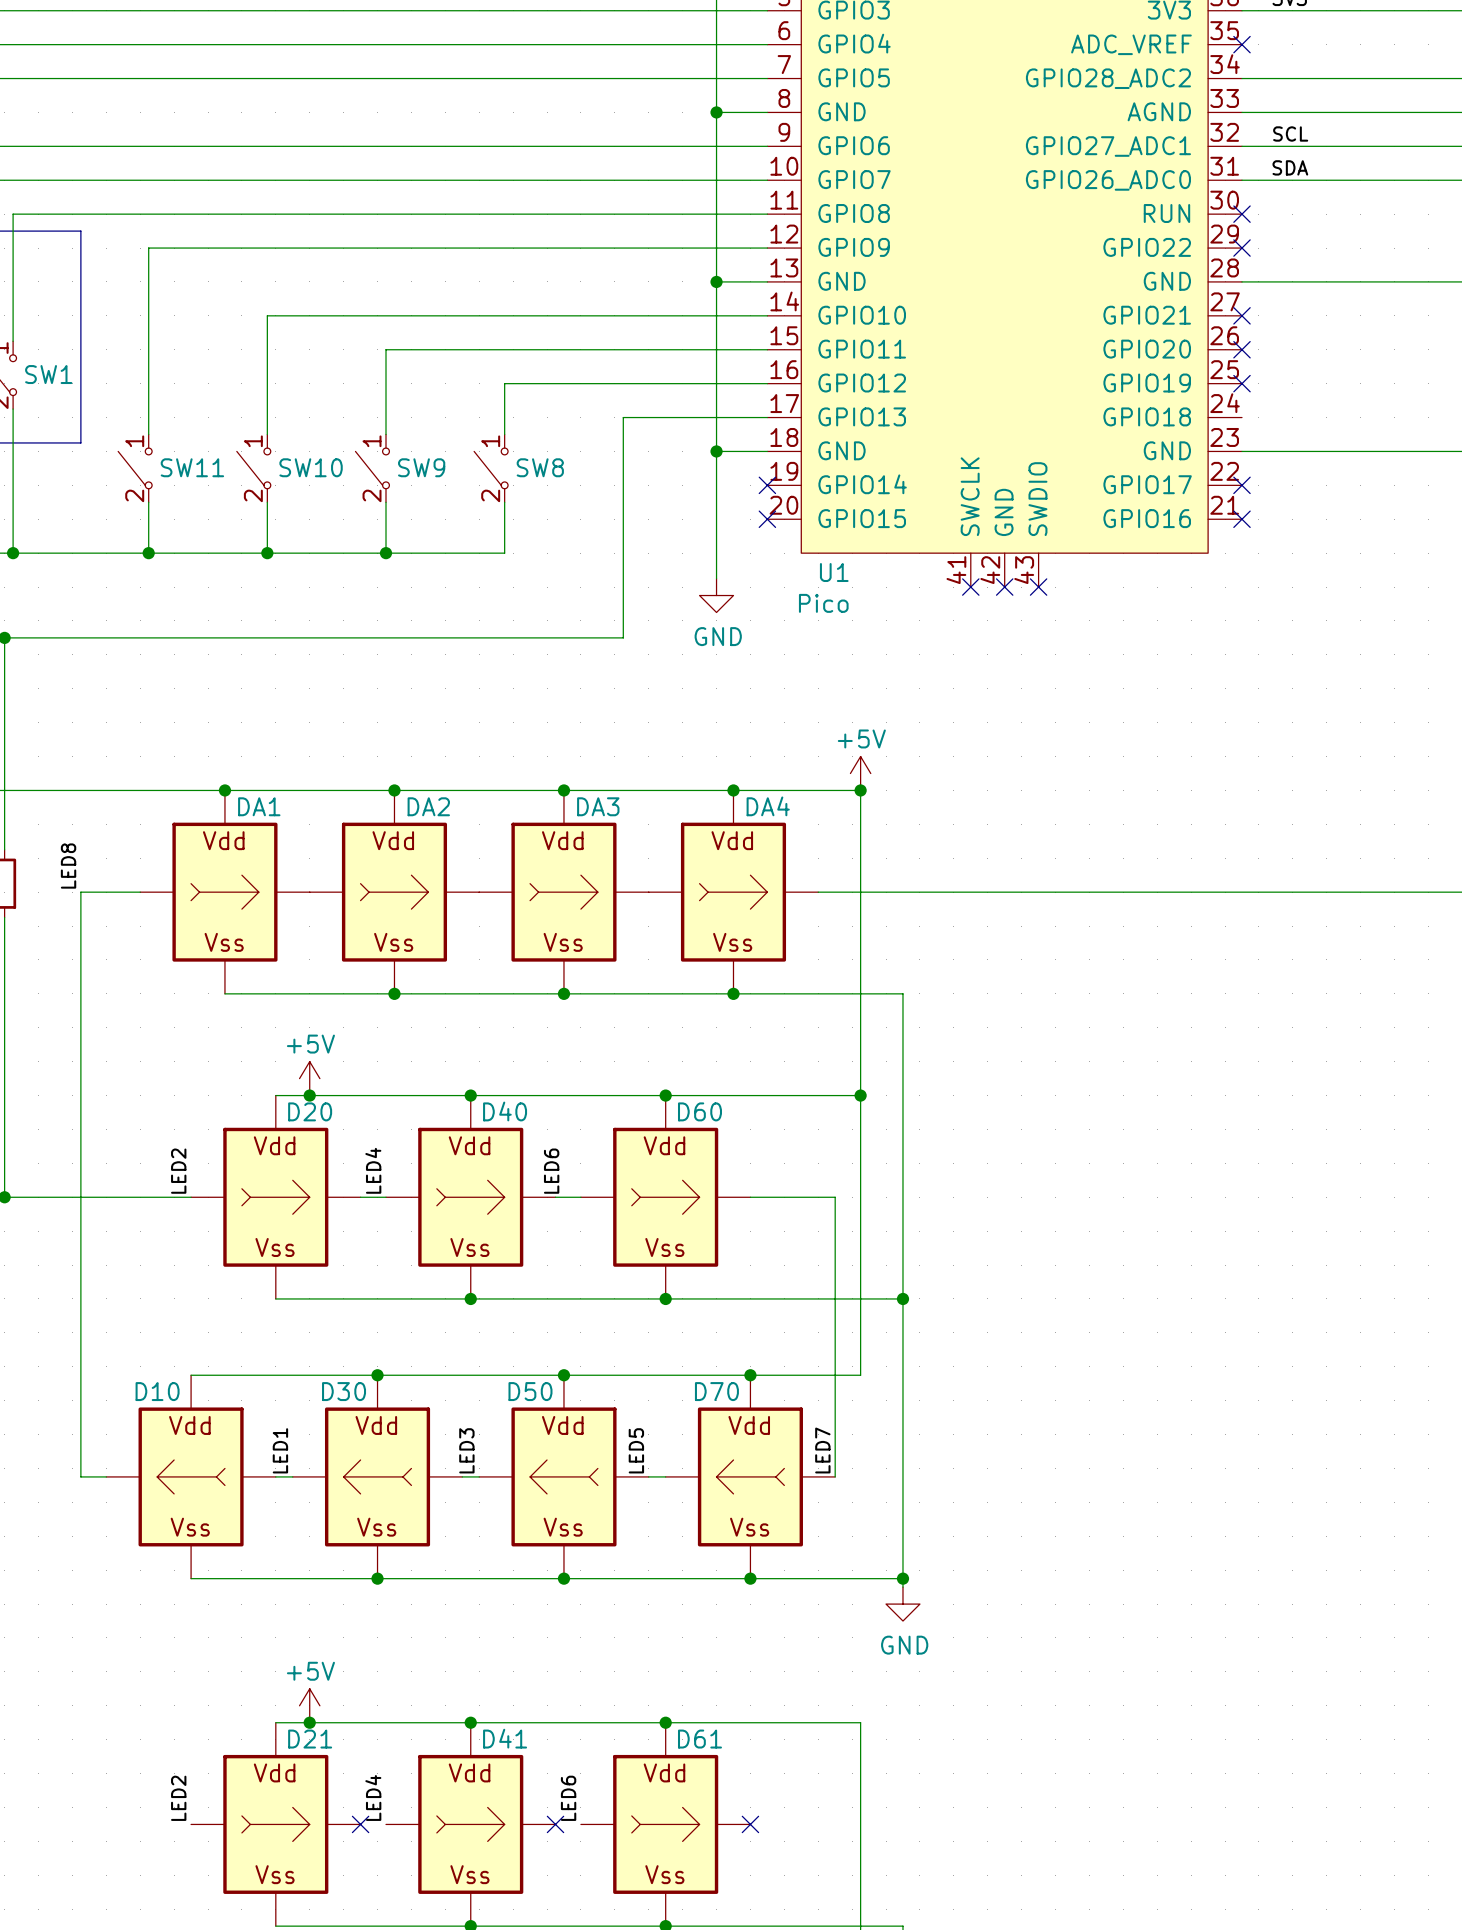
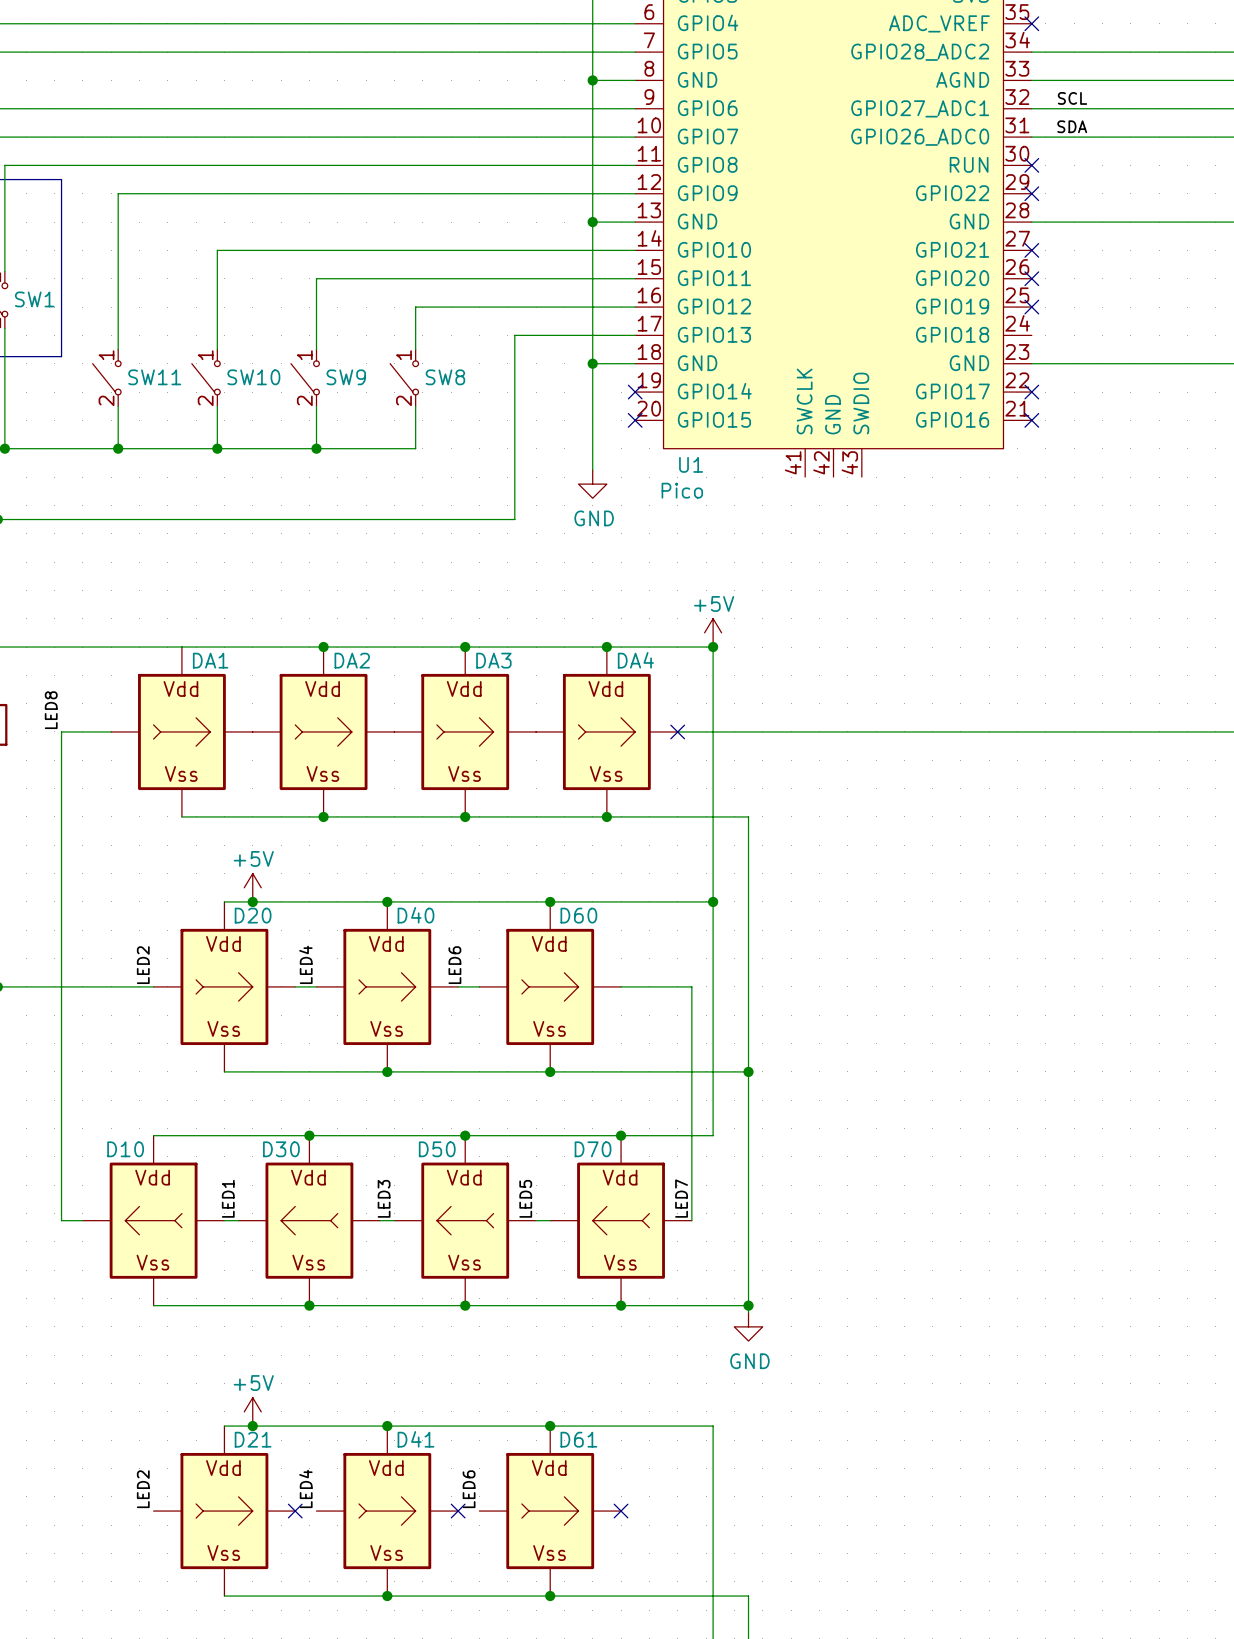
no-connect mark: (970, 587) -> none
no-connect mark: (1004, 587) -> none
no-connect mark: (1038, 587) -> none
junction: (224, 790) -> none
no-connect mark: none -> (677, 731)

